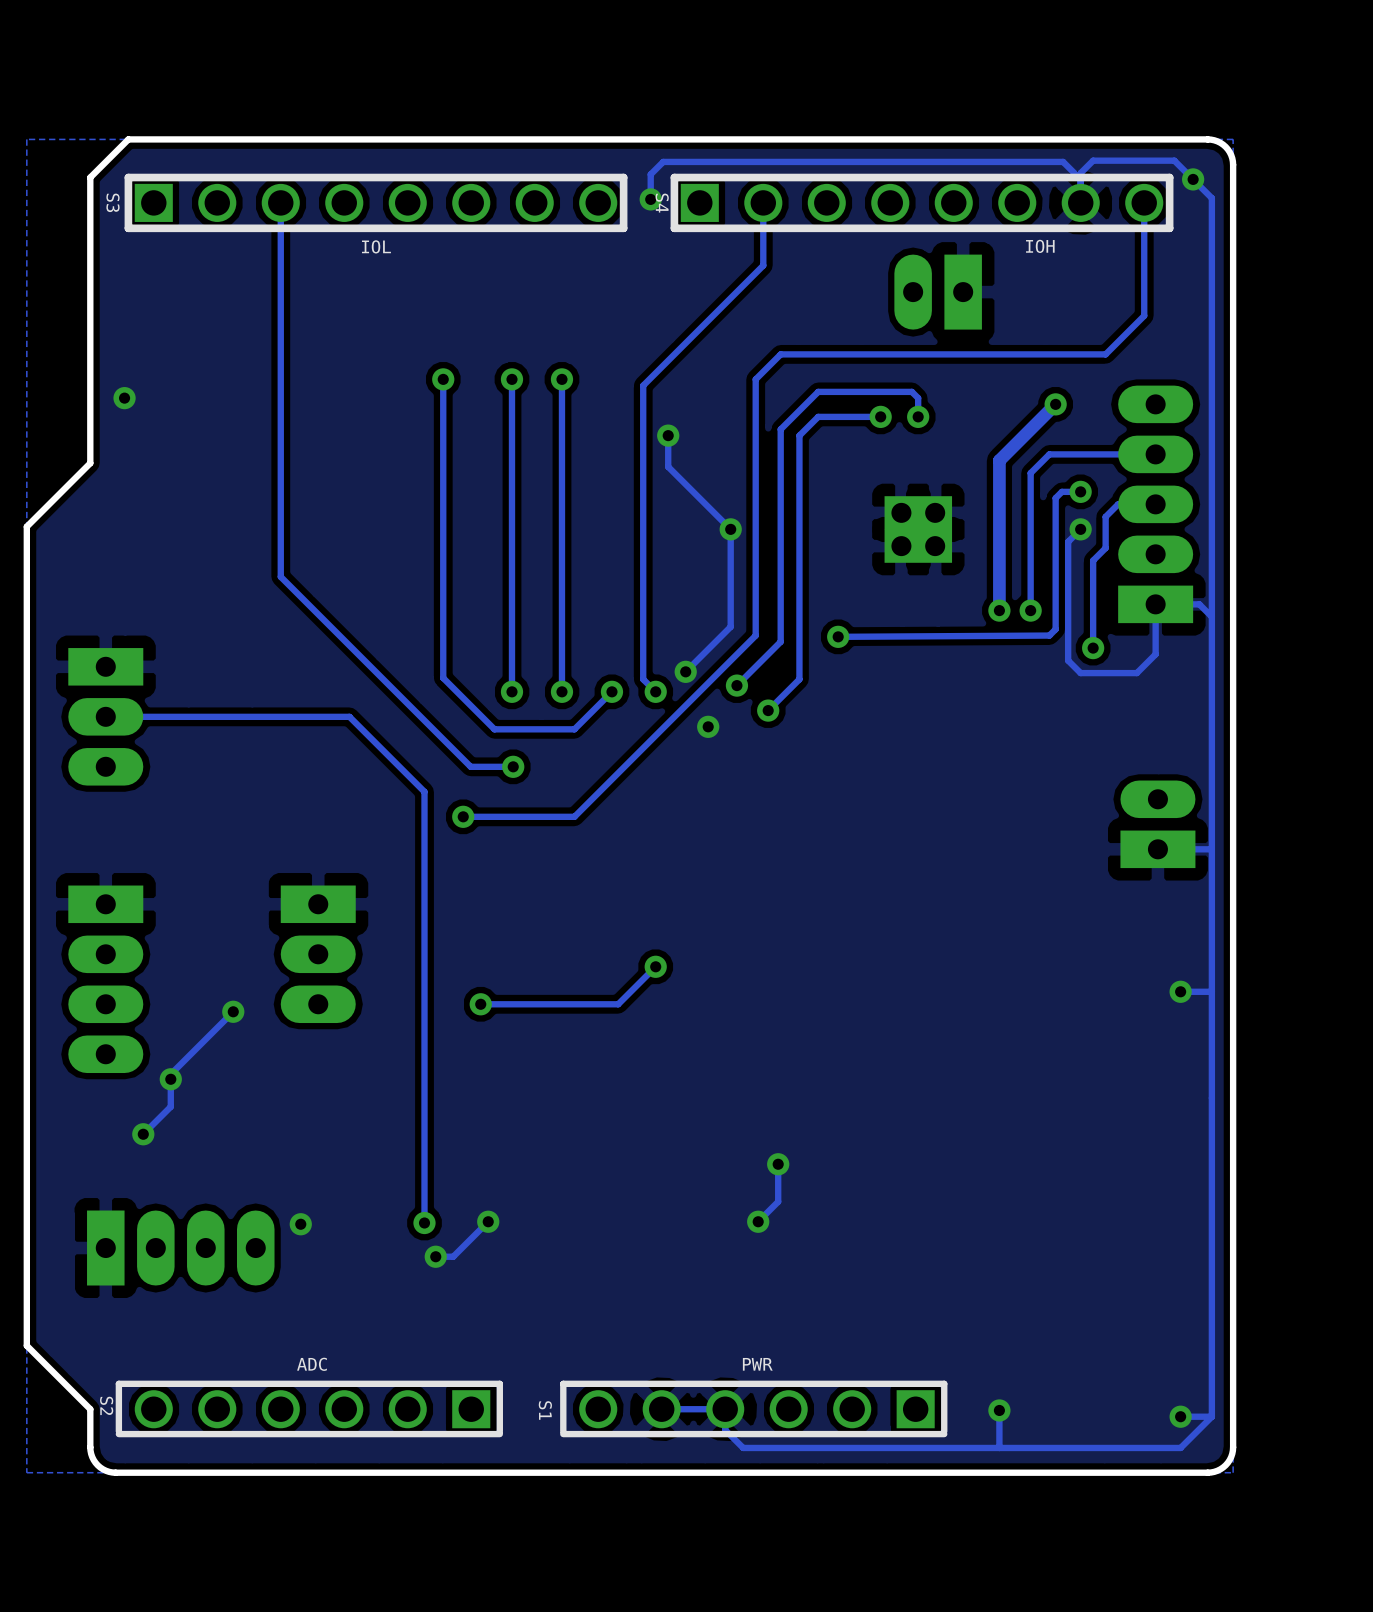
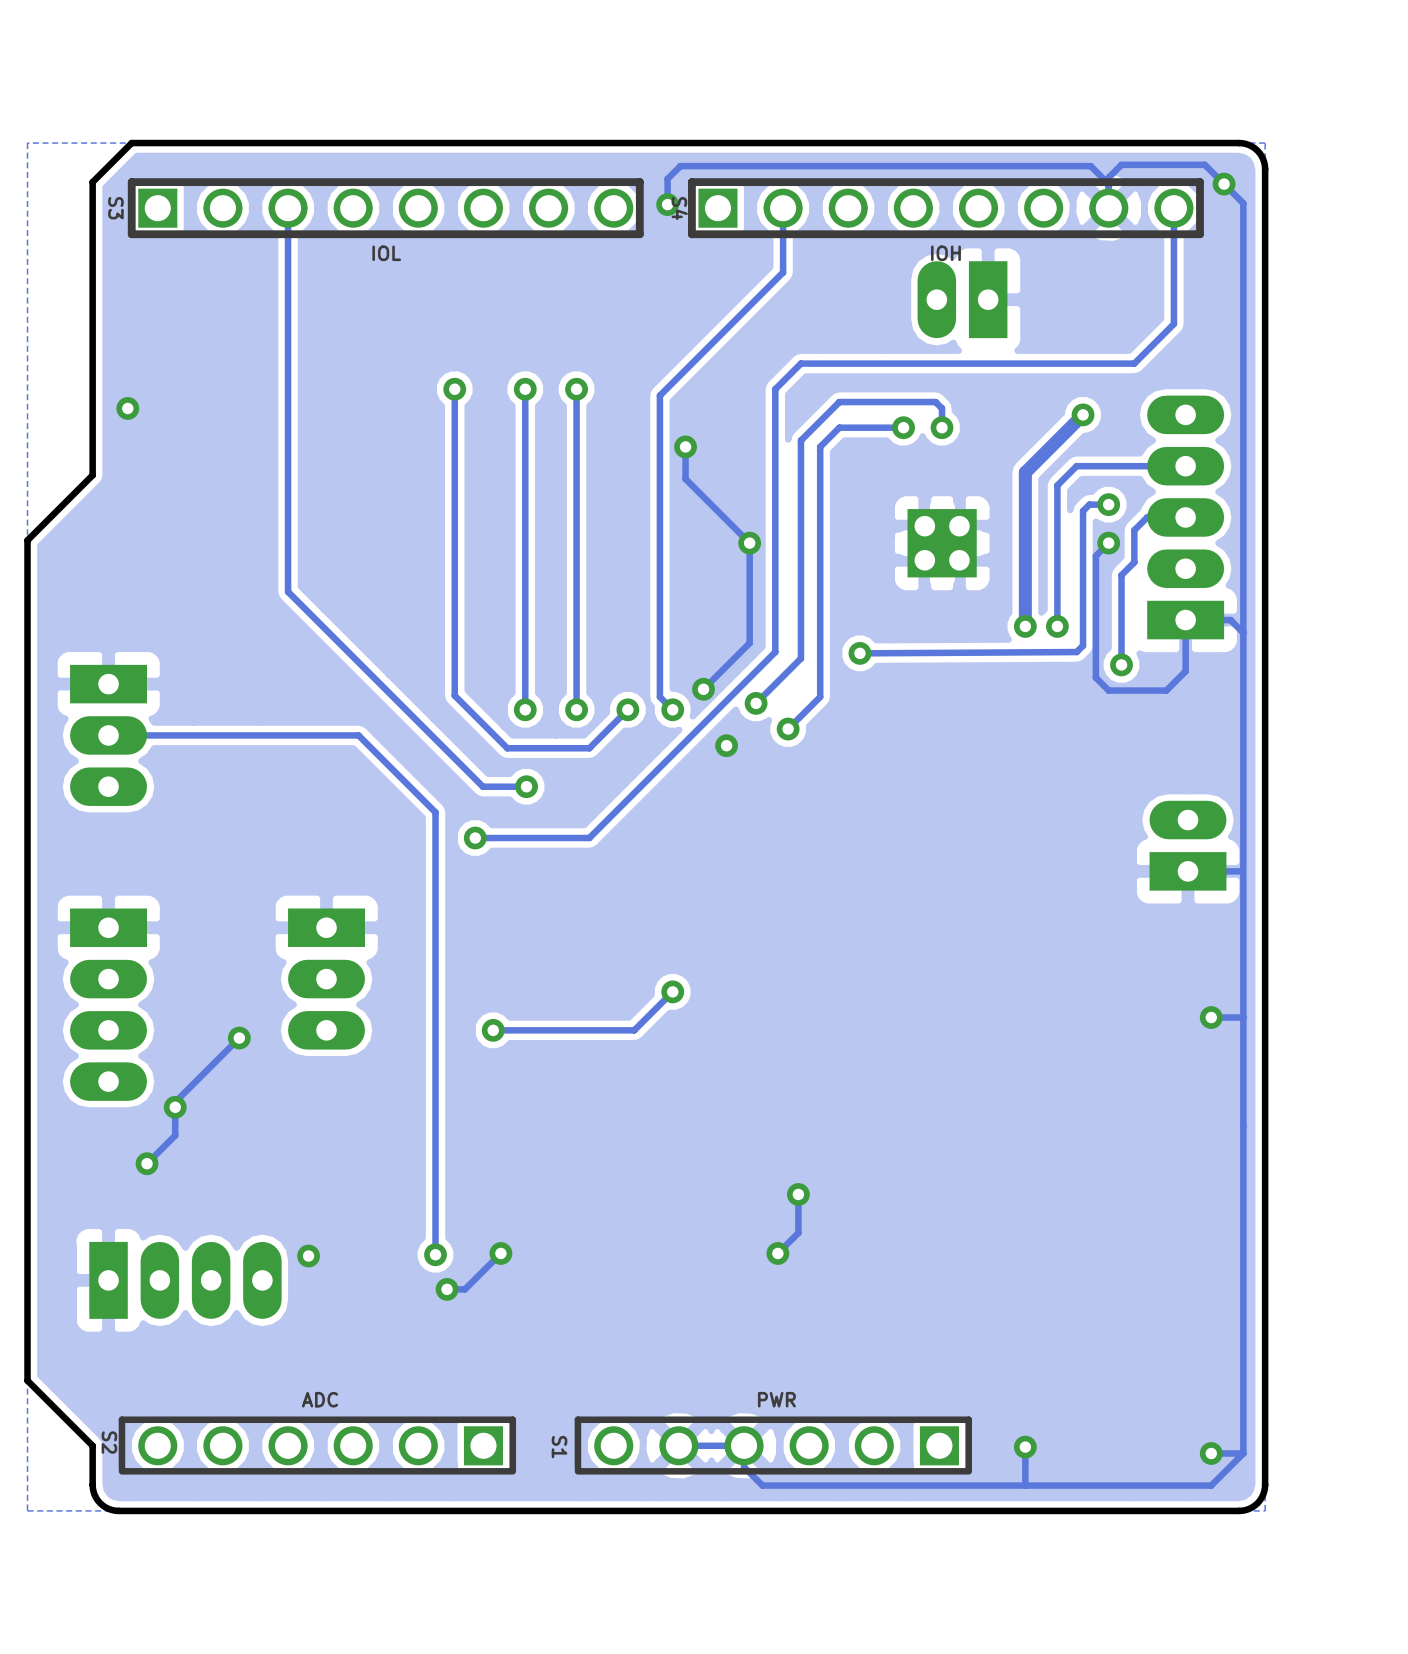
S4 value position: IOH (1040, 246) -> IOH (945, 253)

